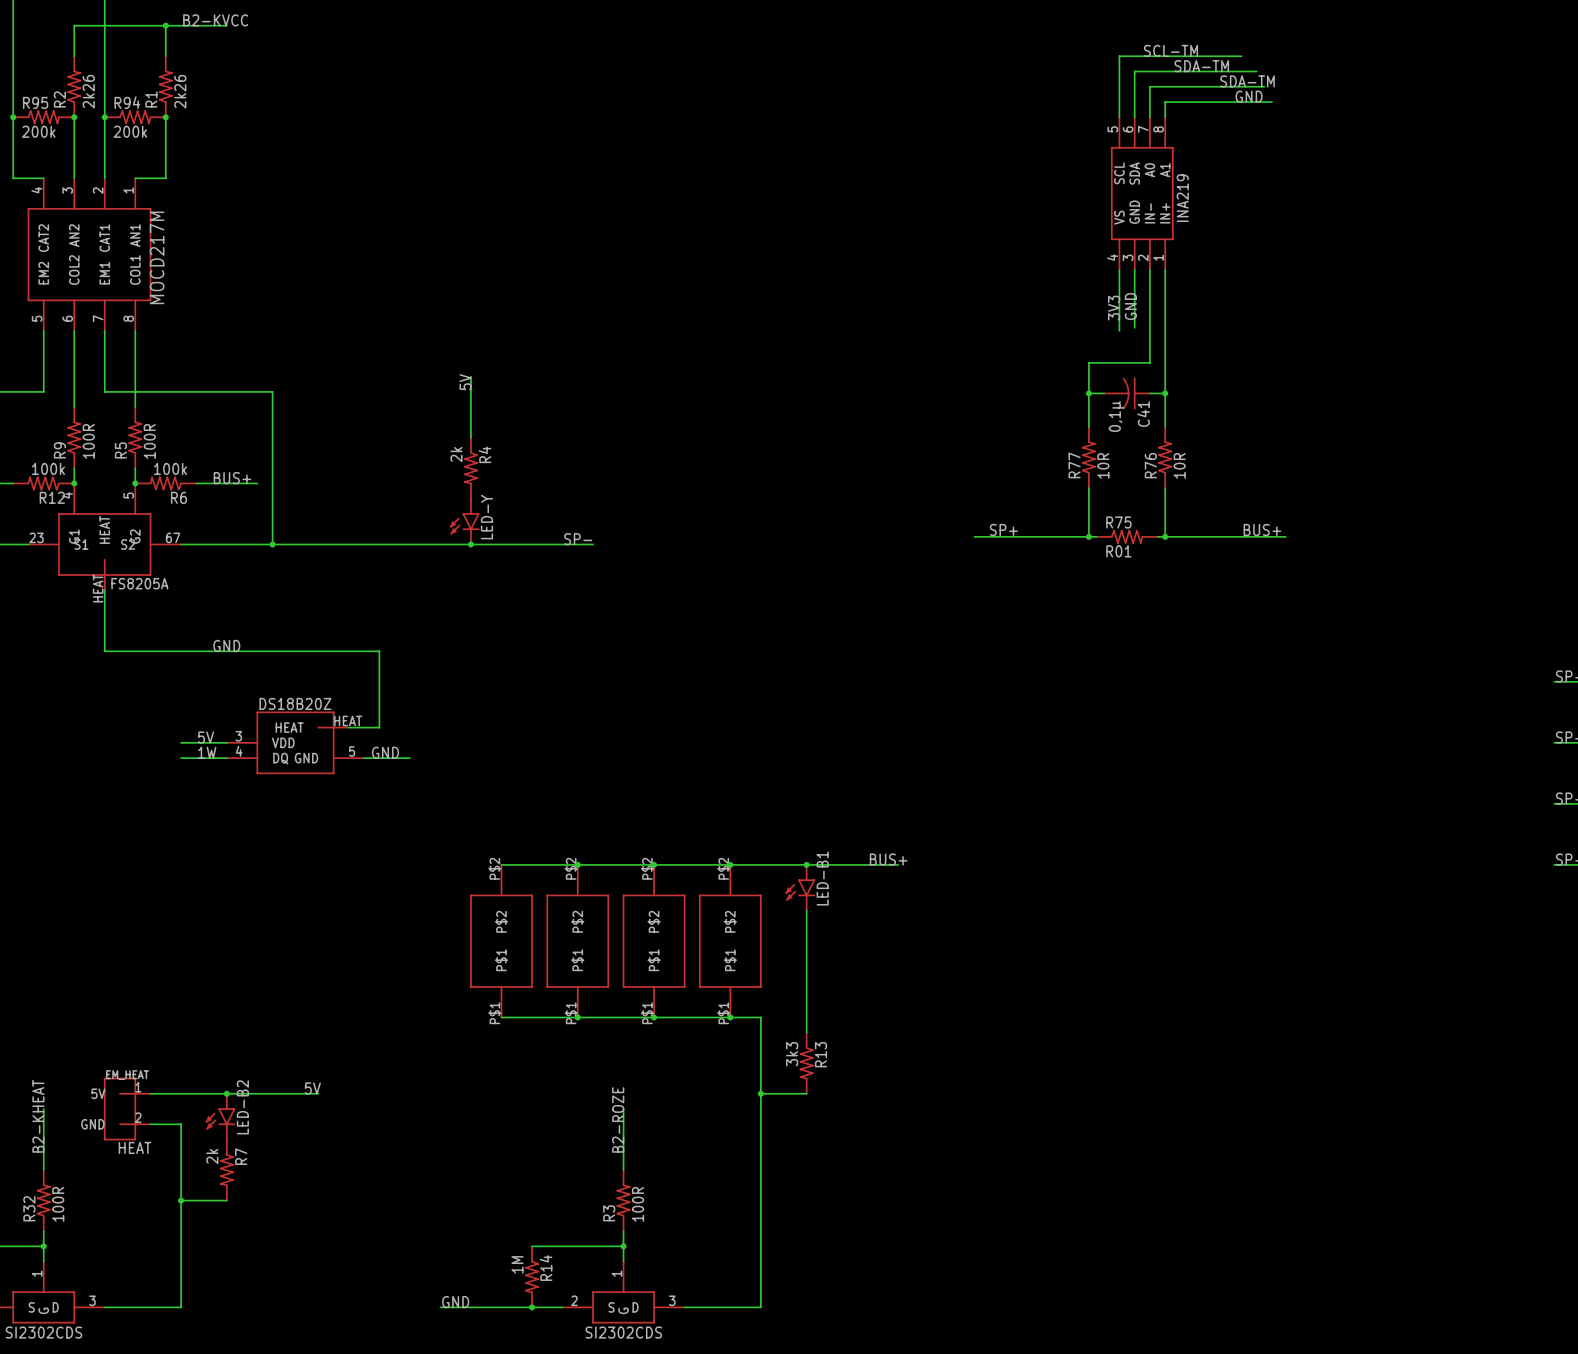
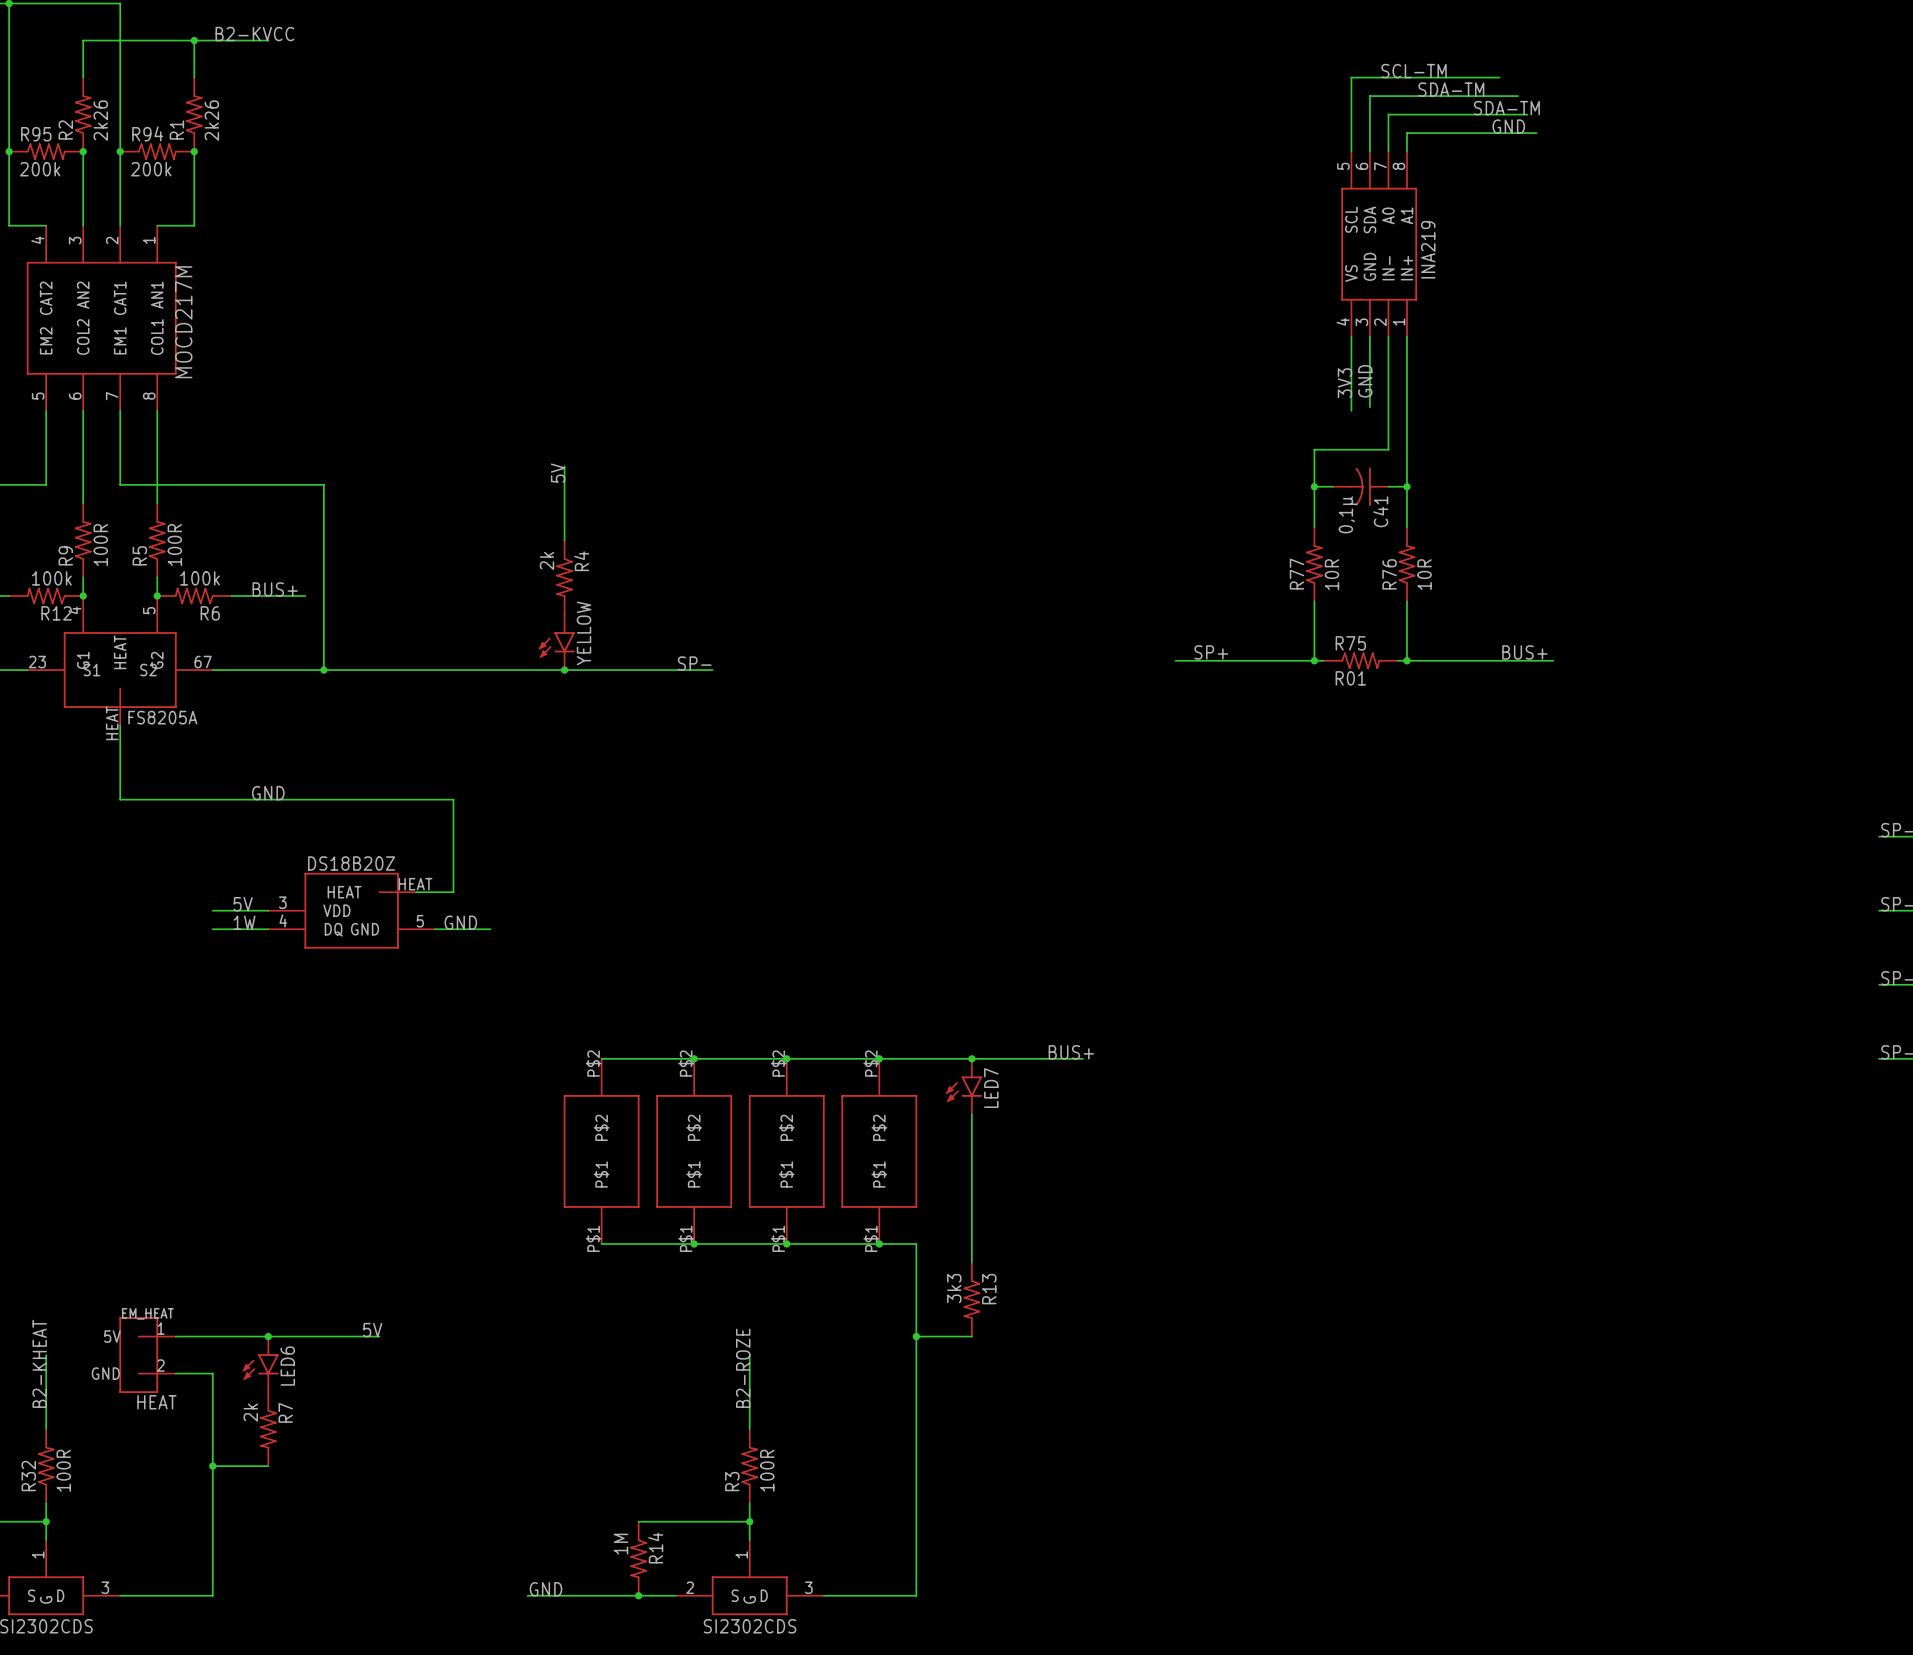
LED-Y name: LED-Y (486, 517) -> YELLOW (584, 633)
LED-B1 name: LED-B1 (822, 878) -> LED7 (991, 1088)
LED-B2 name: LED-B2 (242, 1107) -> LED6 (287, 1366)

